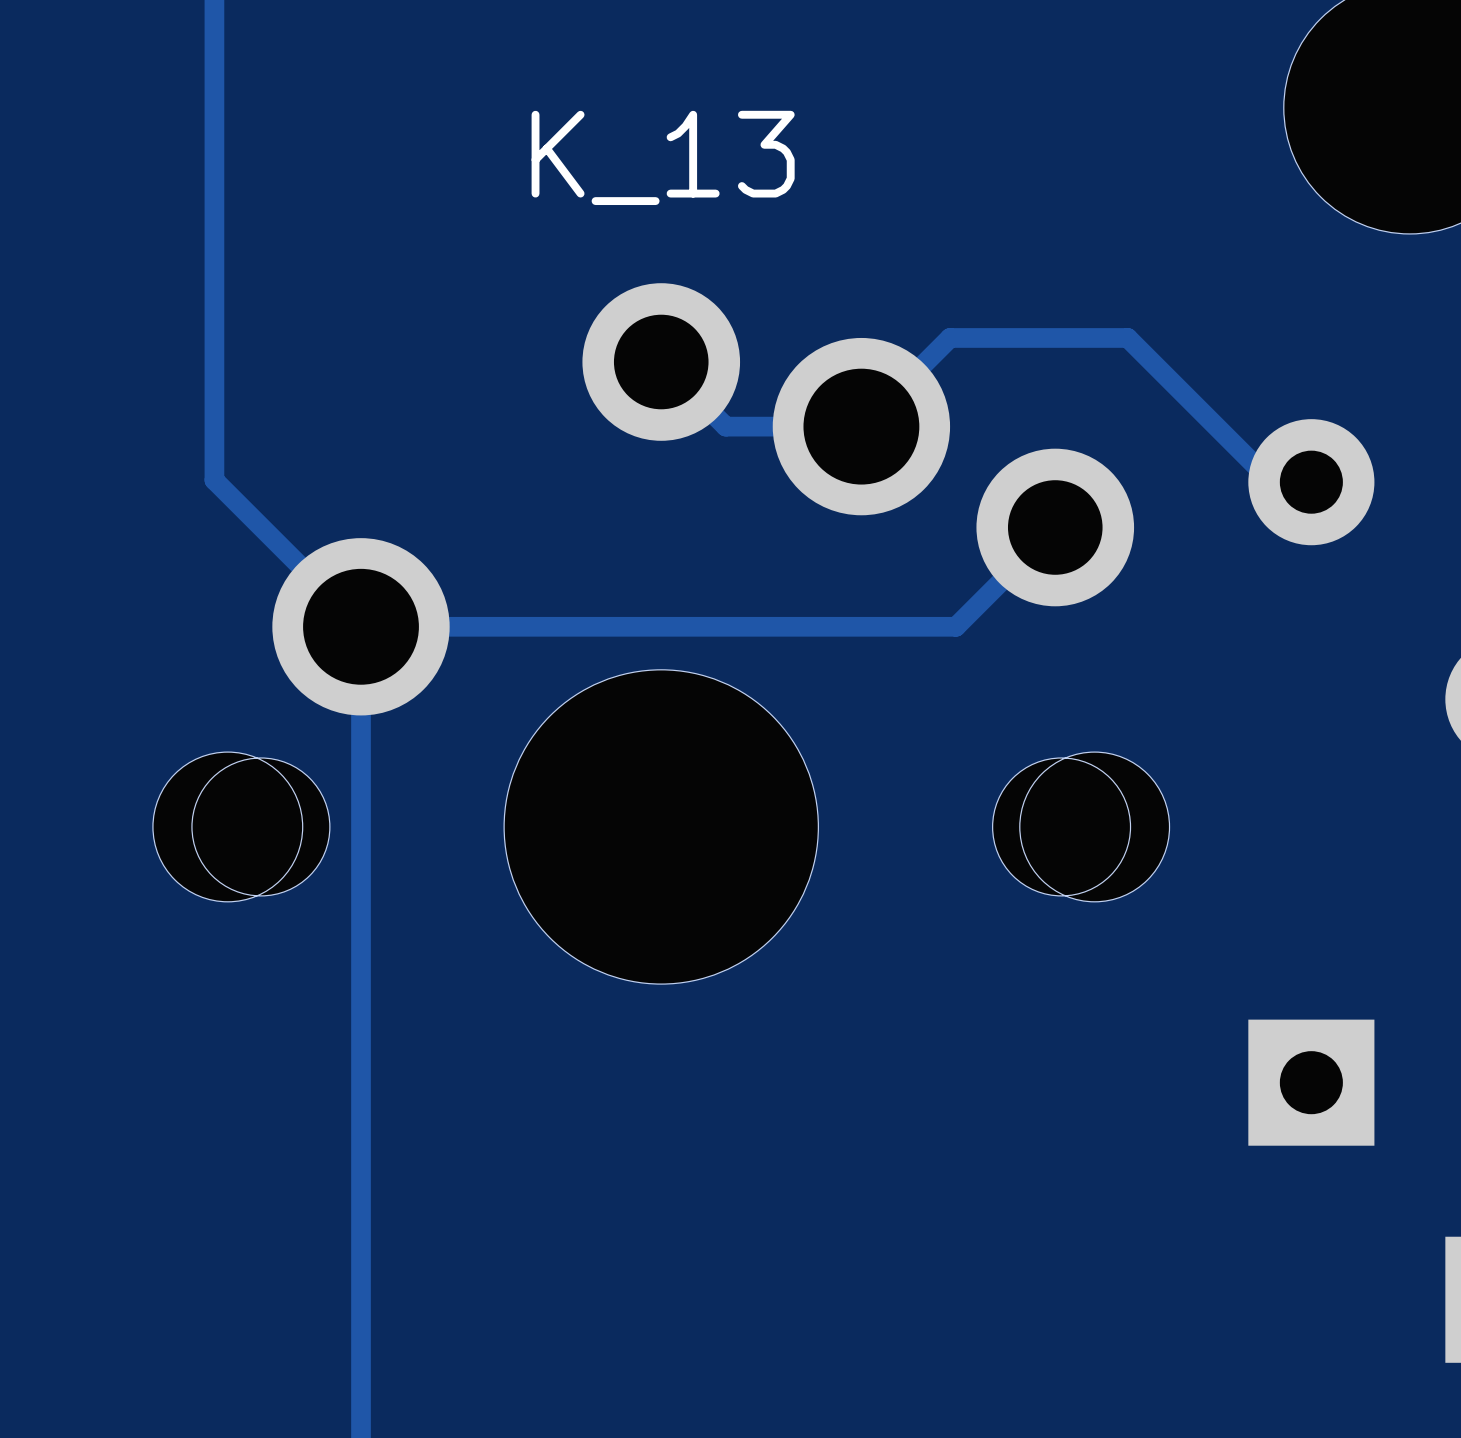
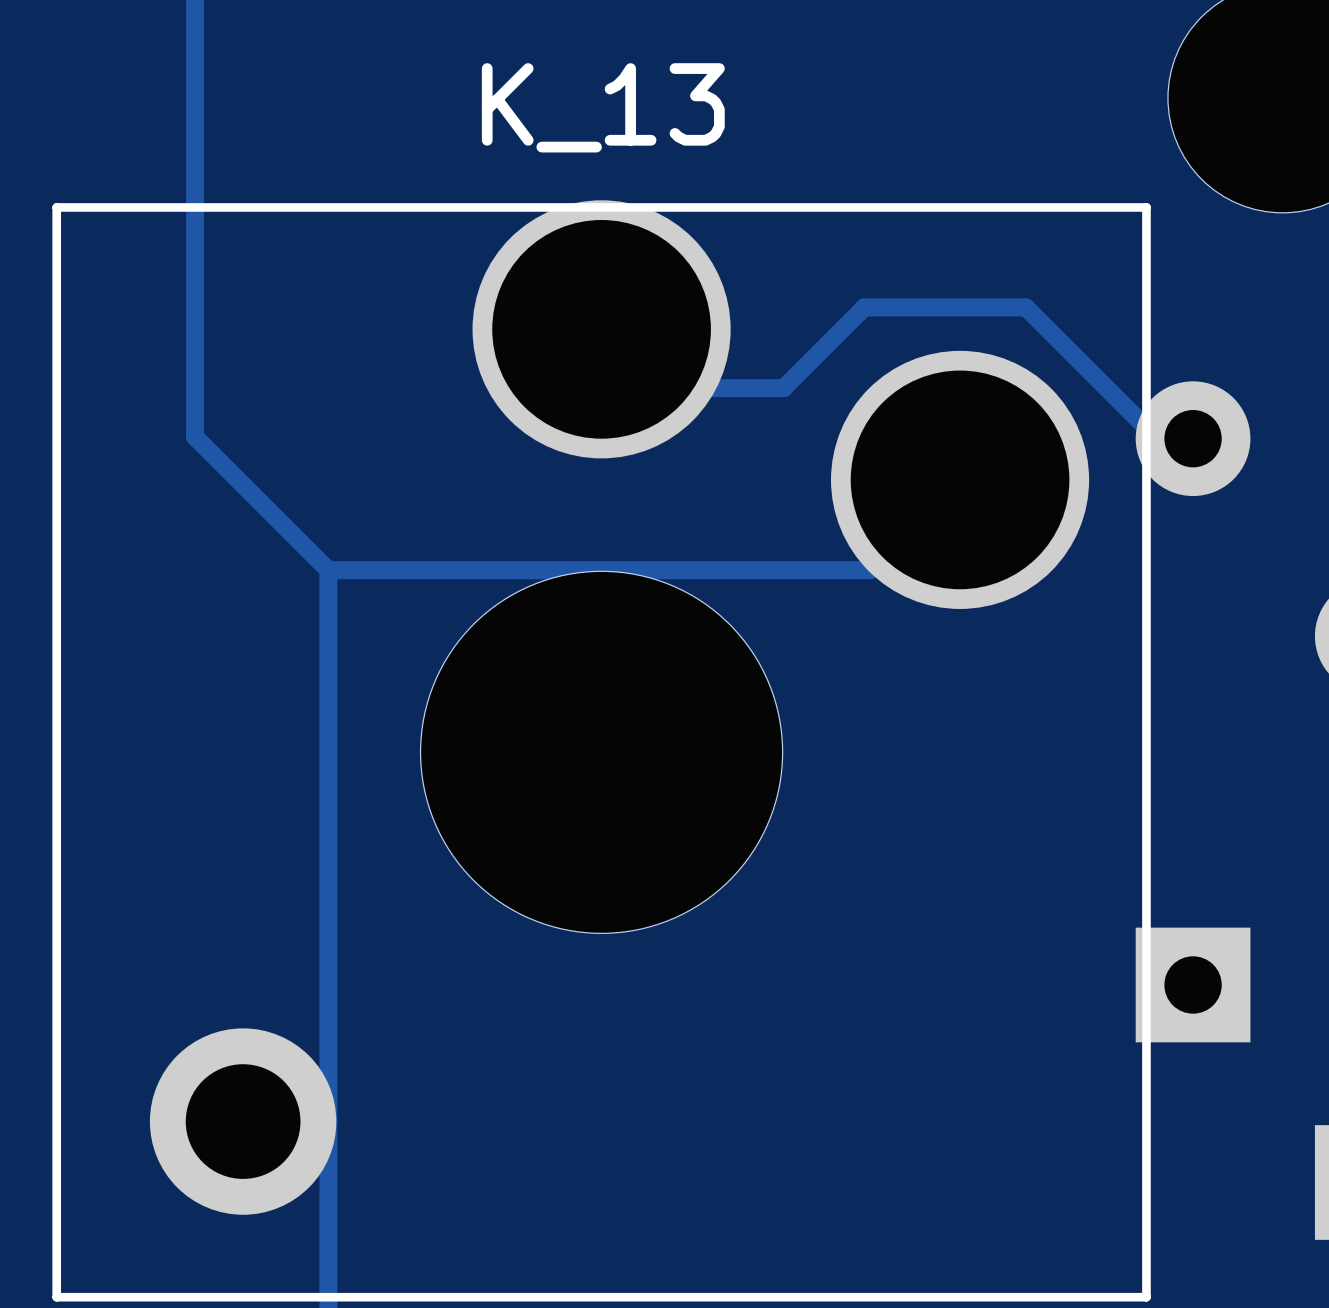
K_13 name position: K_13 (663, 157) -> K_13 (603, 107)
K_13 footprint: [152, 283, 1170, 985] -> [52, 200, 1151, 1302]

